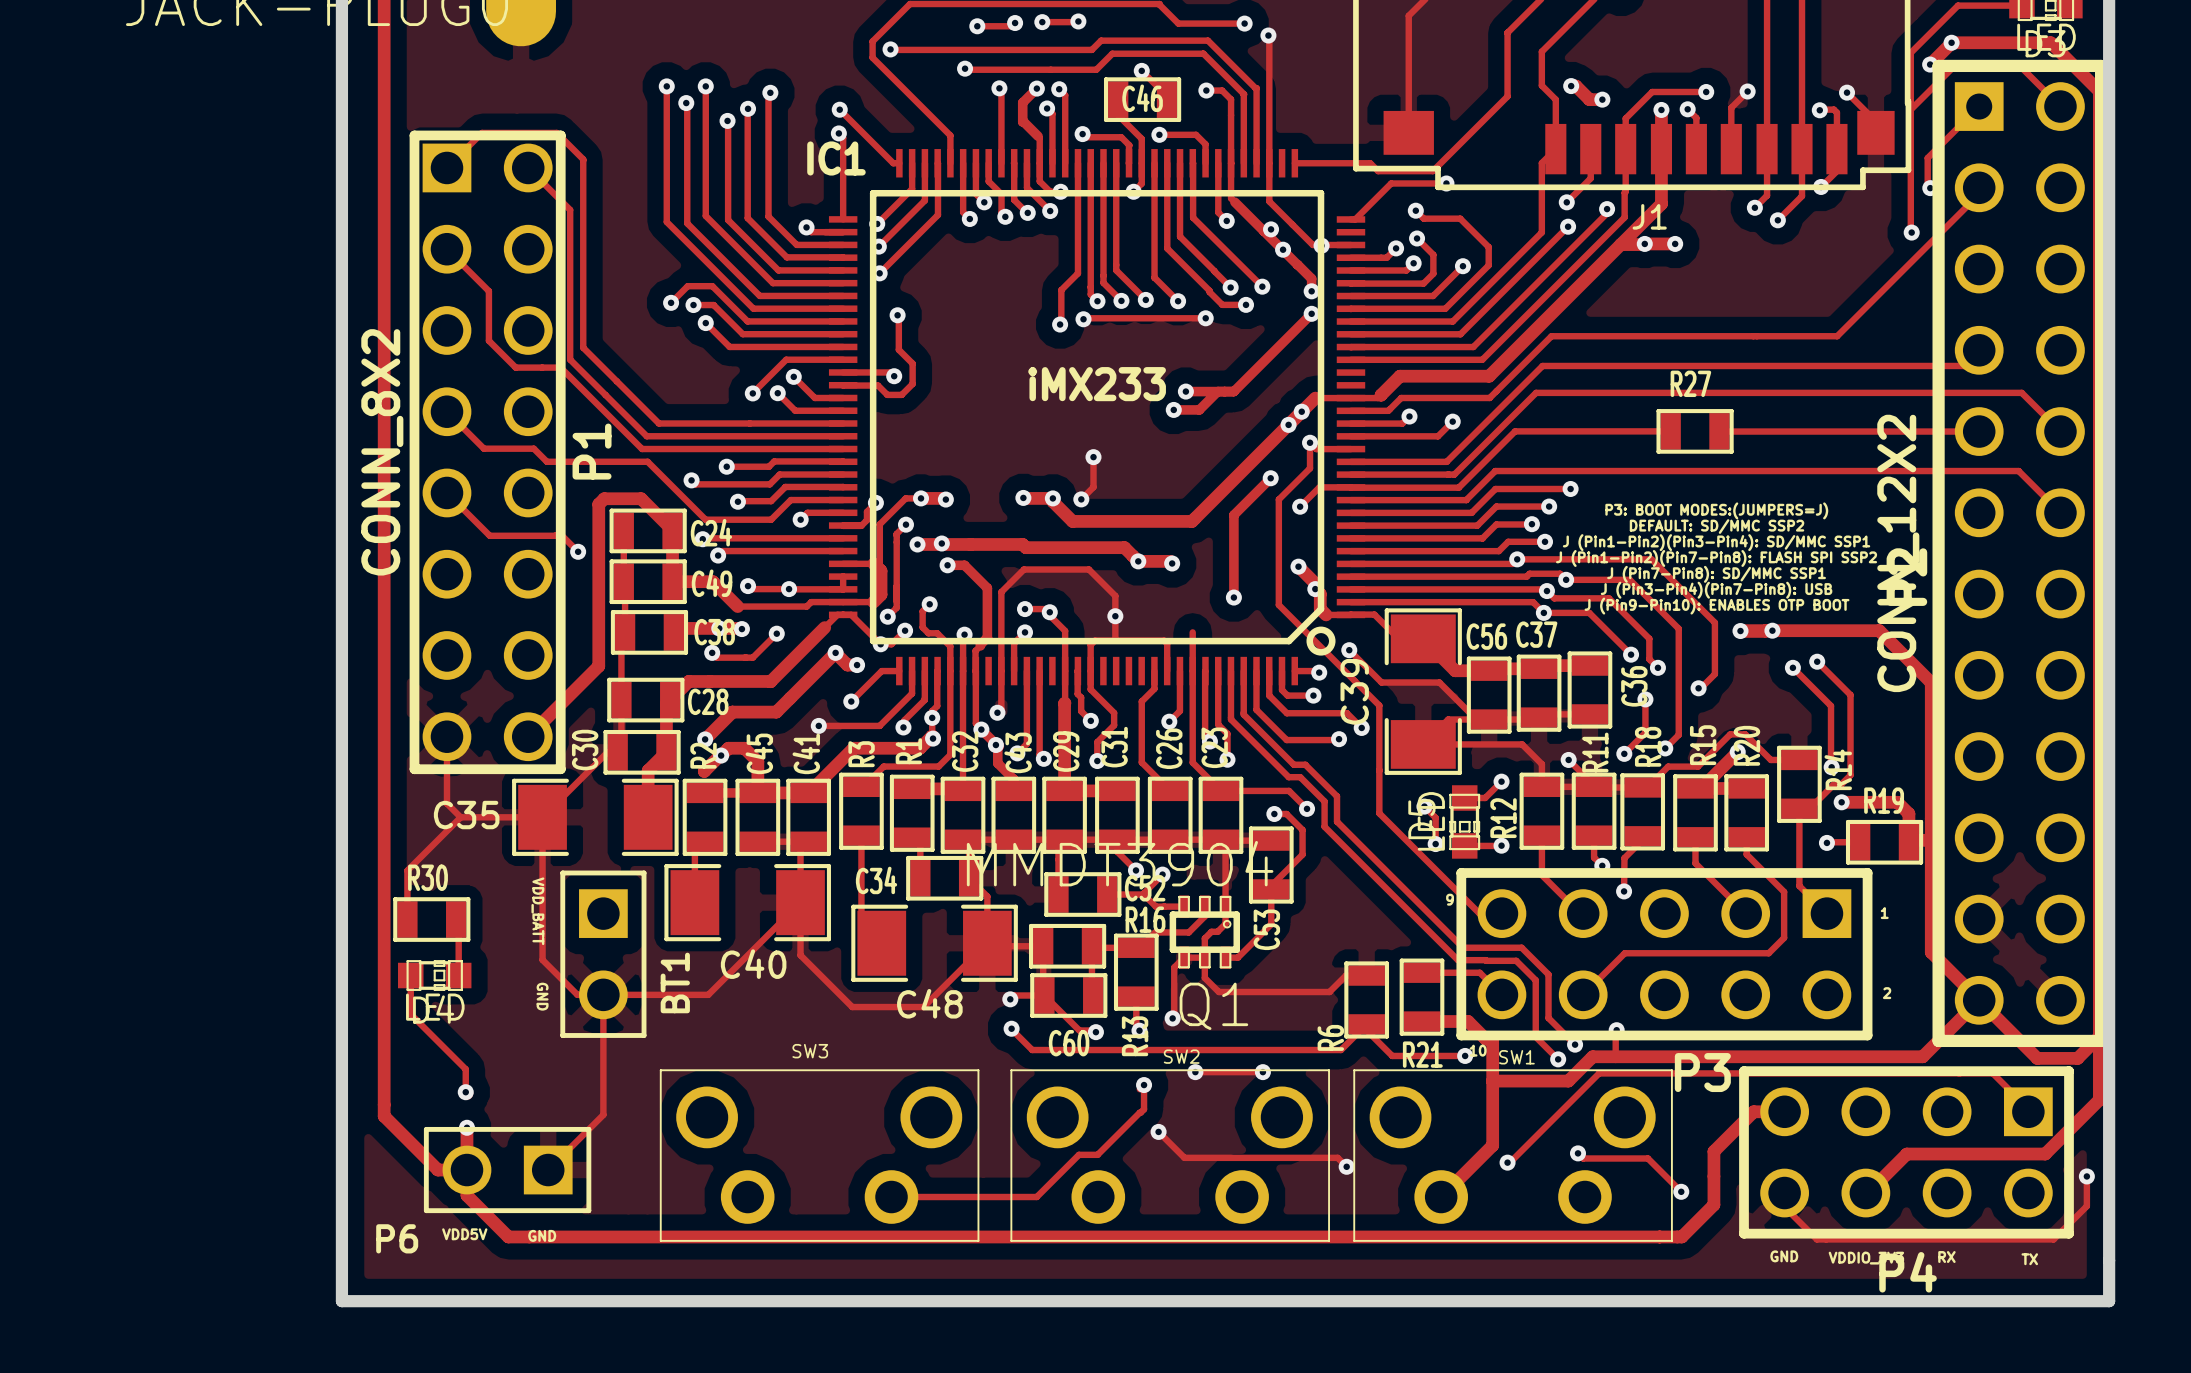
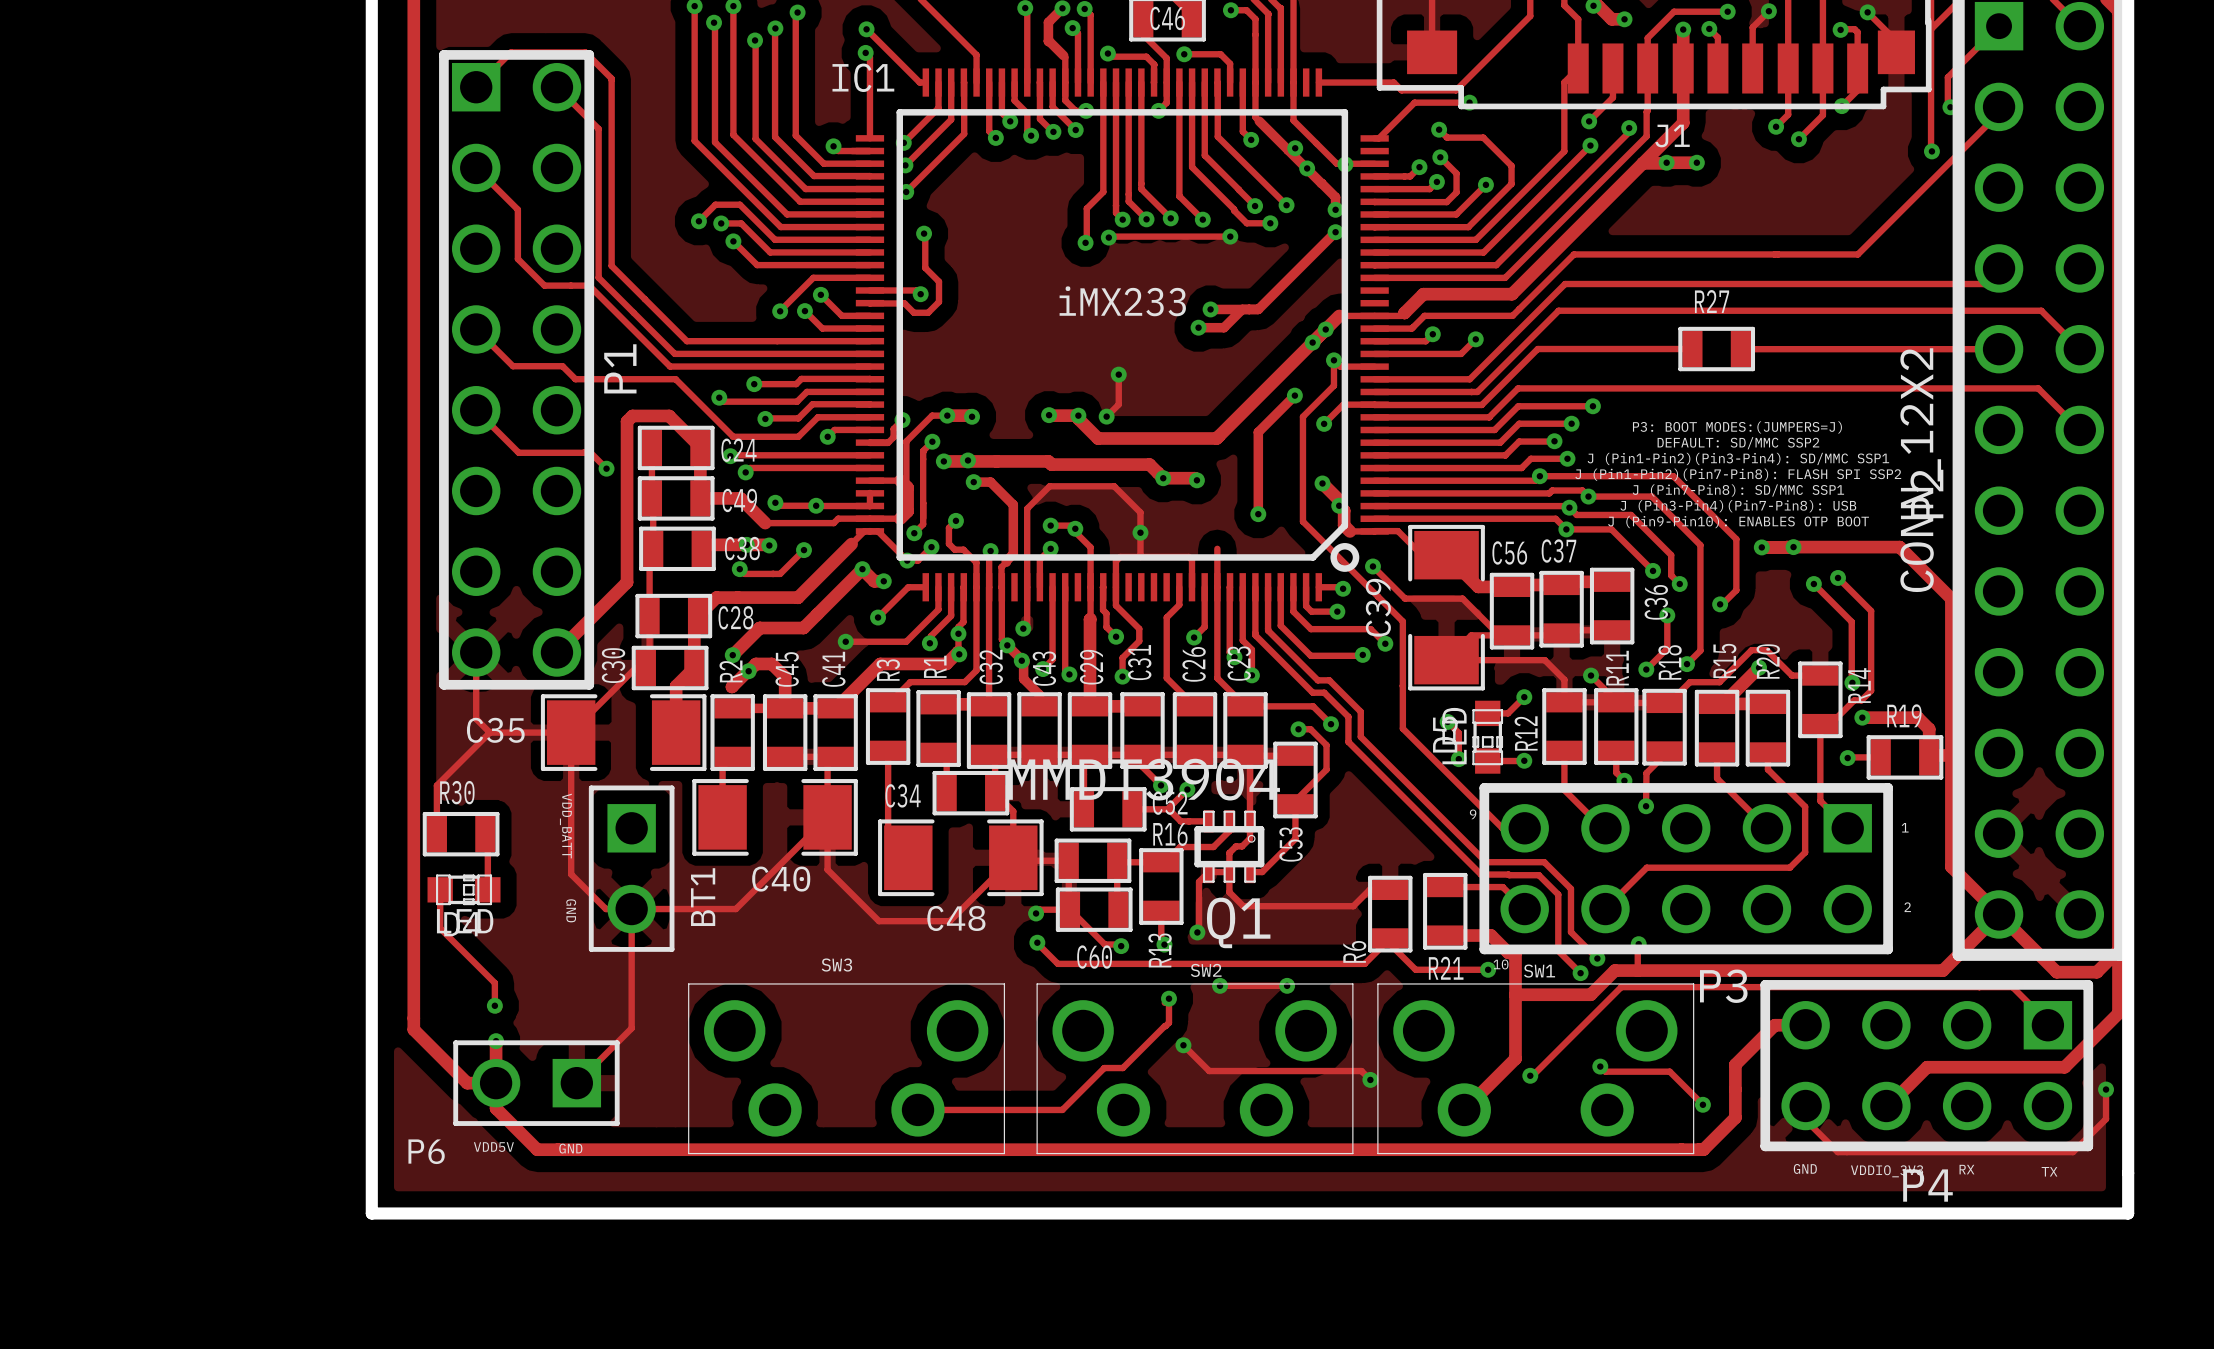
P1 value: CONN_8X2 (382, 452) -> none

